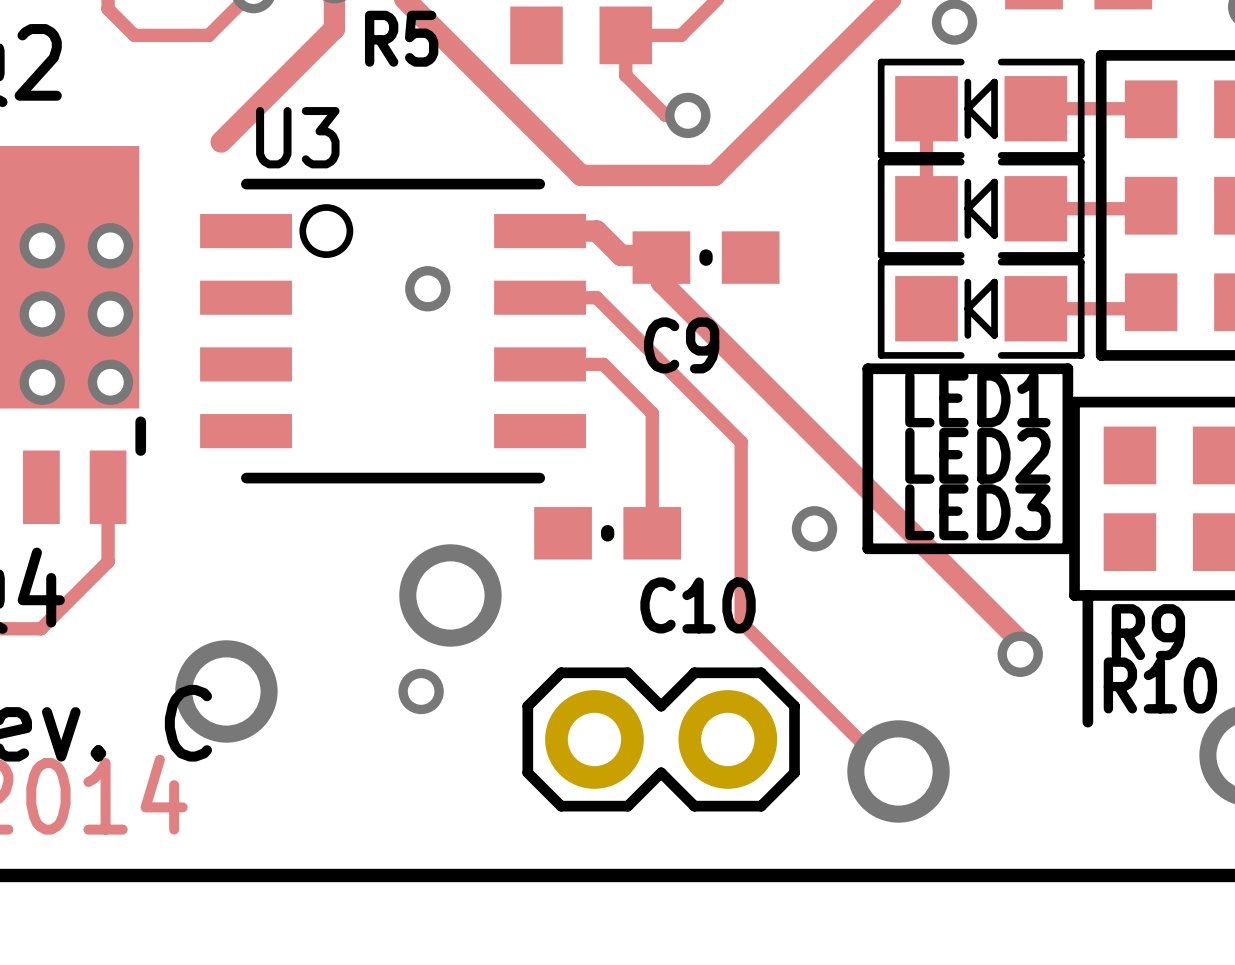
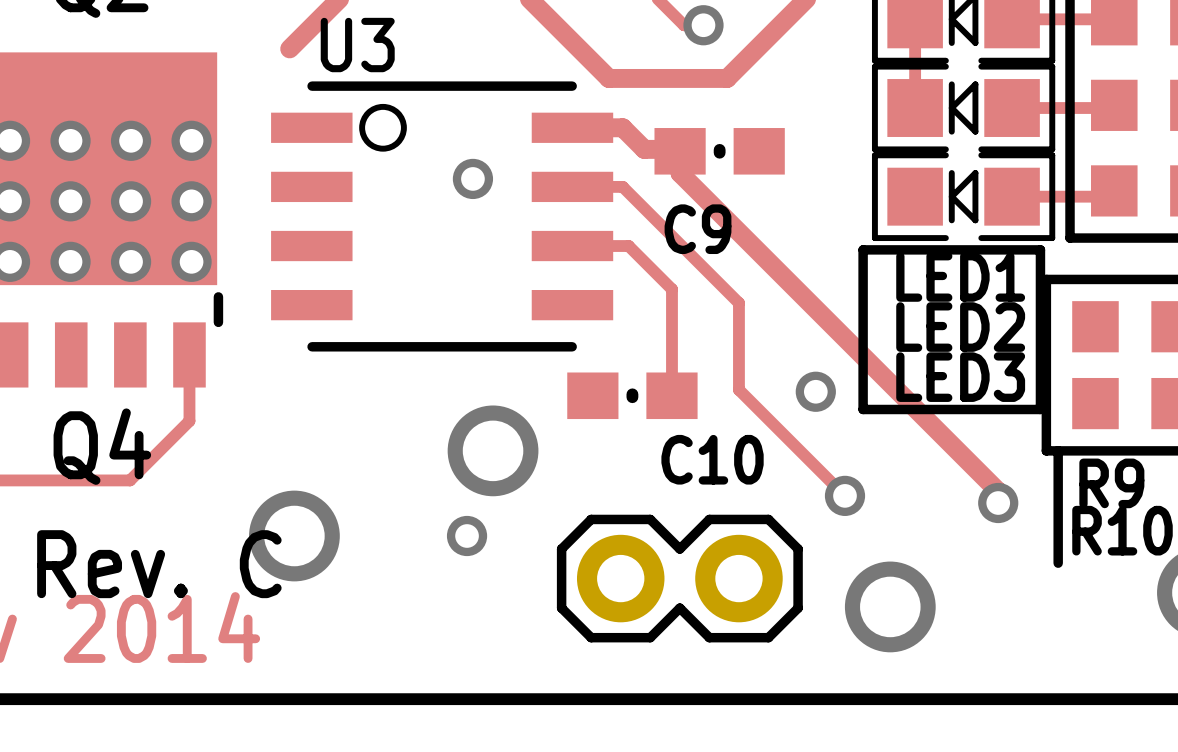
track: (727, 428) (741, 442) (741, 622) (890, 771) (898, 771) -> (738, 303) (738, 389) (845, 495)
via: none -> (845, 495)

